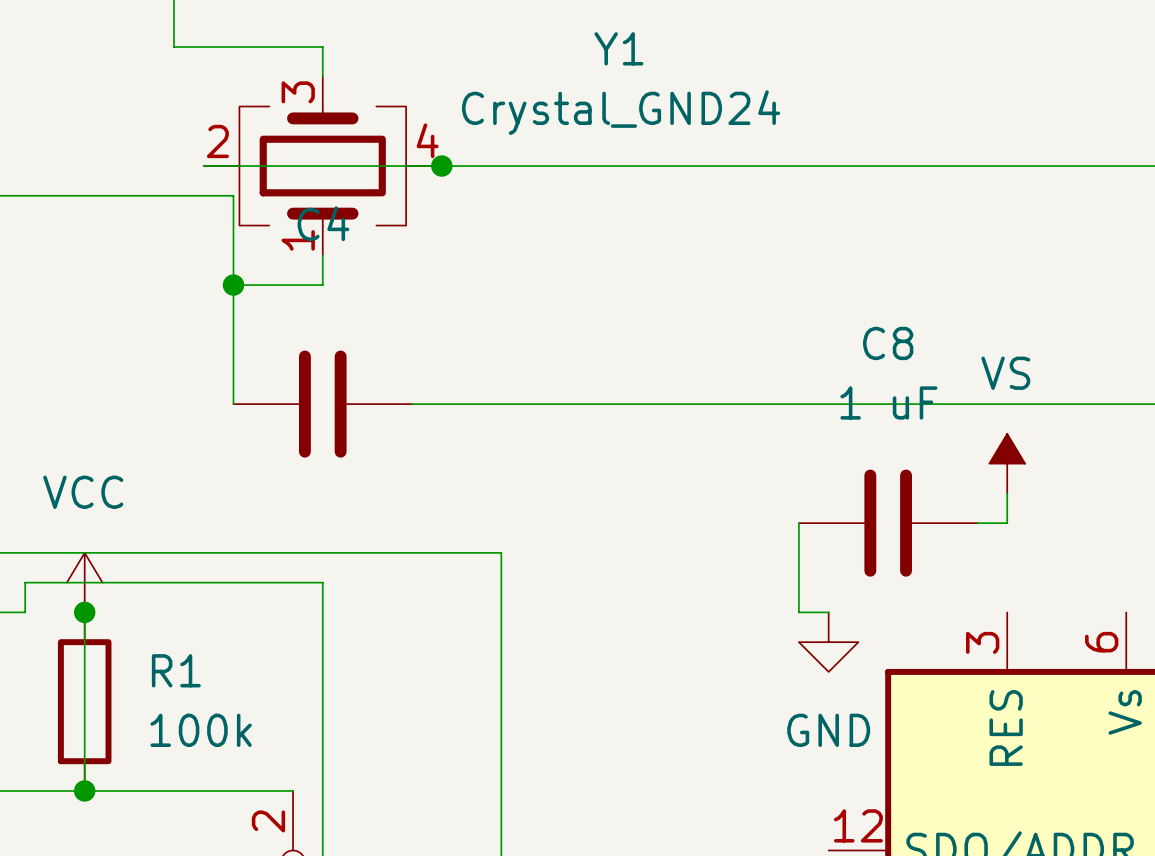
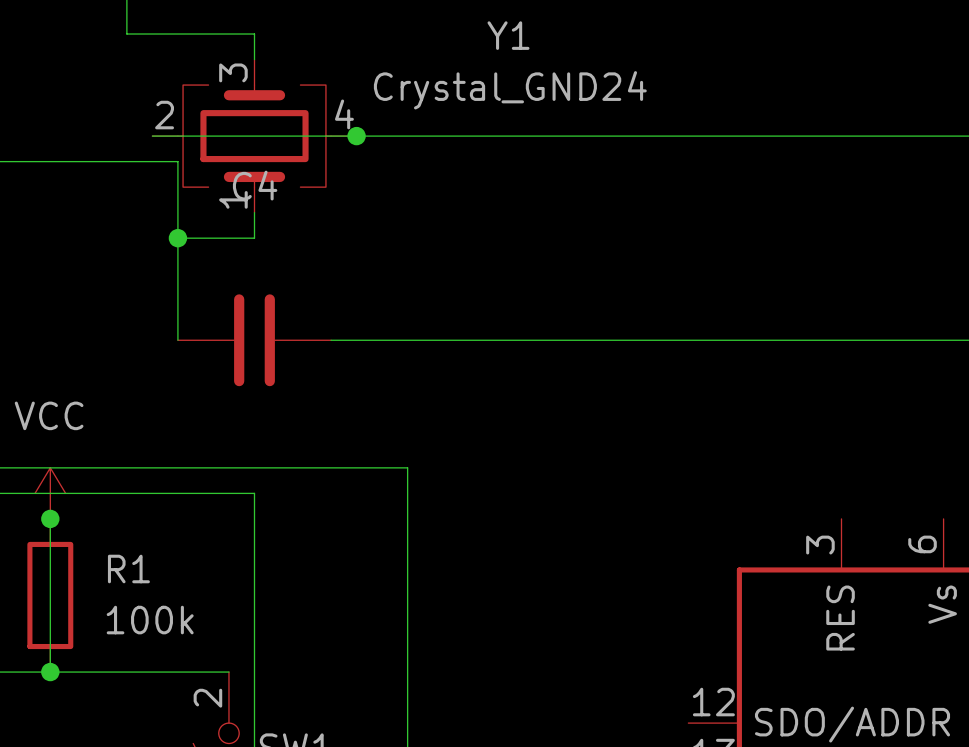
power symbol: VS (1007, 463) -> none
wire: (1007, 493) (1007, 523) (977, 523) -> none
wire: (798, 523) (798, 612) (828, 612) -> none
C8: 1 uF (888, 523) -> none
power symbol: GND (828, 642) -> none

